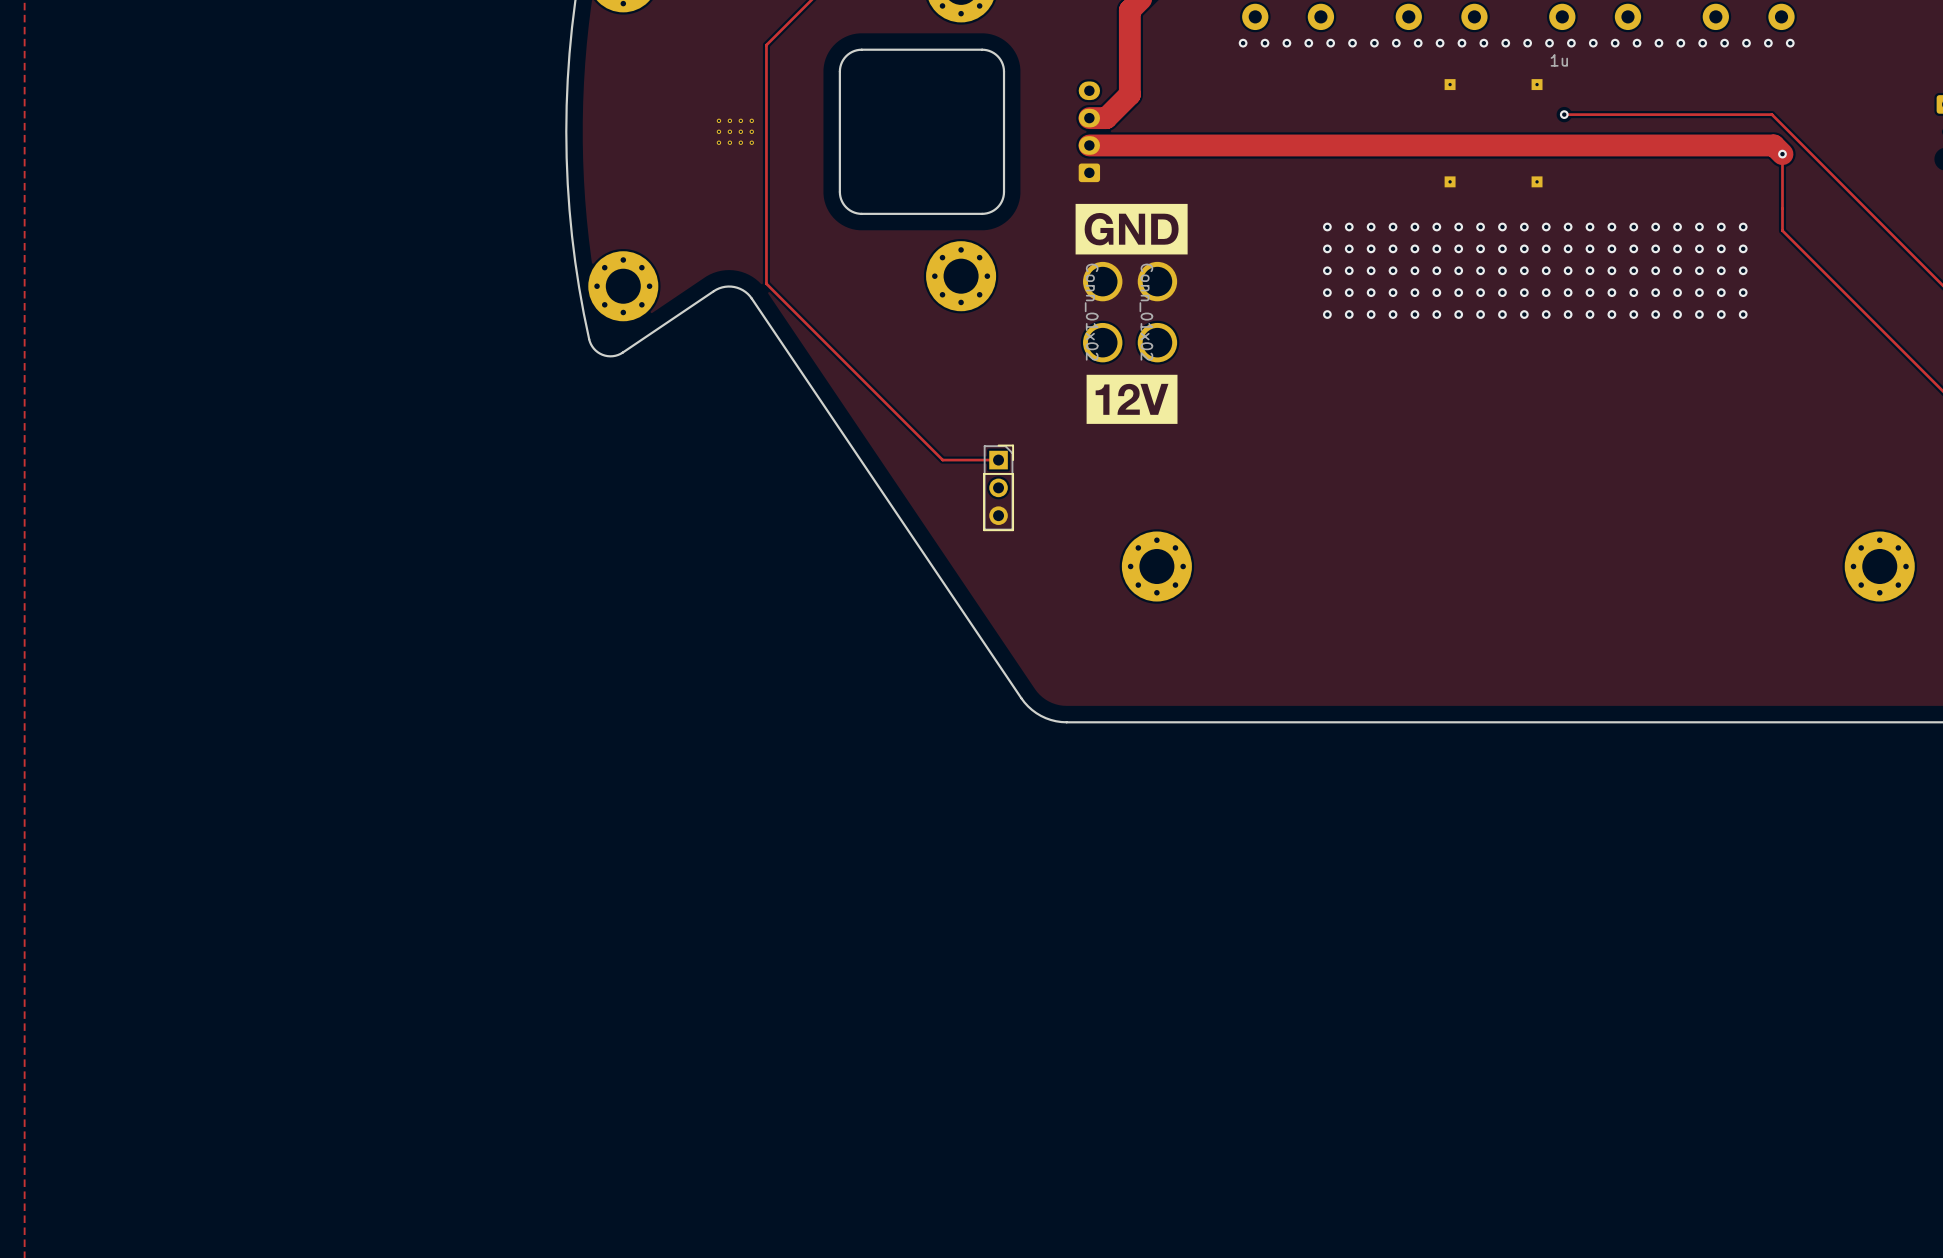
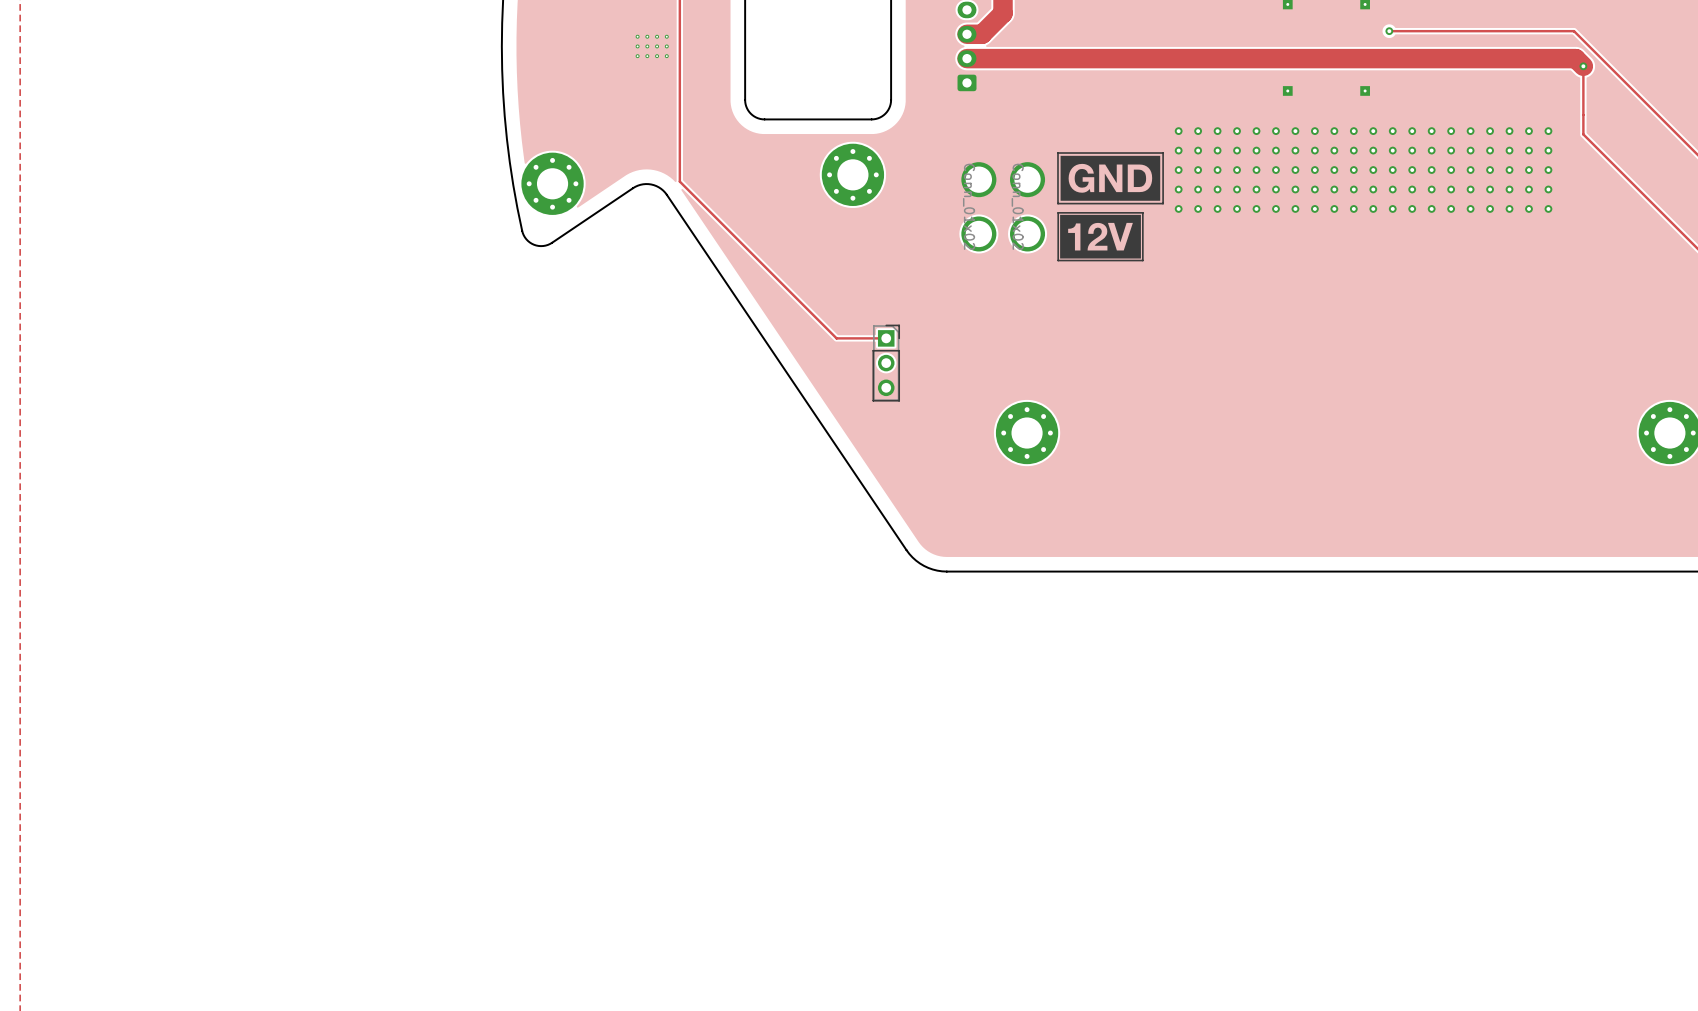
drawing position: (1131, 229) -> (1110, 178)
line: none -> (1057, 153) (1163, 153) (1163, 203) (1057, 203) (1057, 153)
line: none -> (1058, 212) (1142, 212) (1142, 260) (1058, 260) (1058, 212)
drawing position: (1132, 399) -> (1100, 236)

